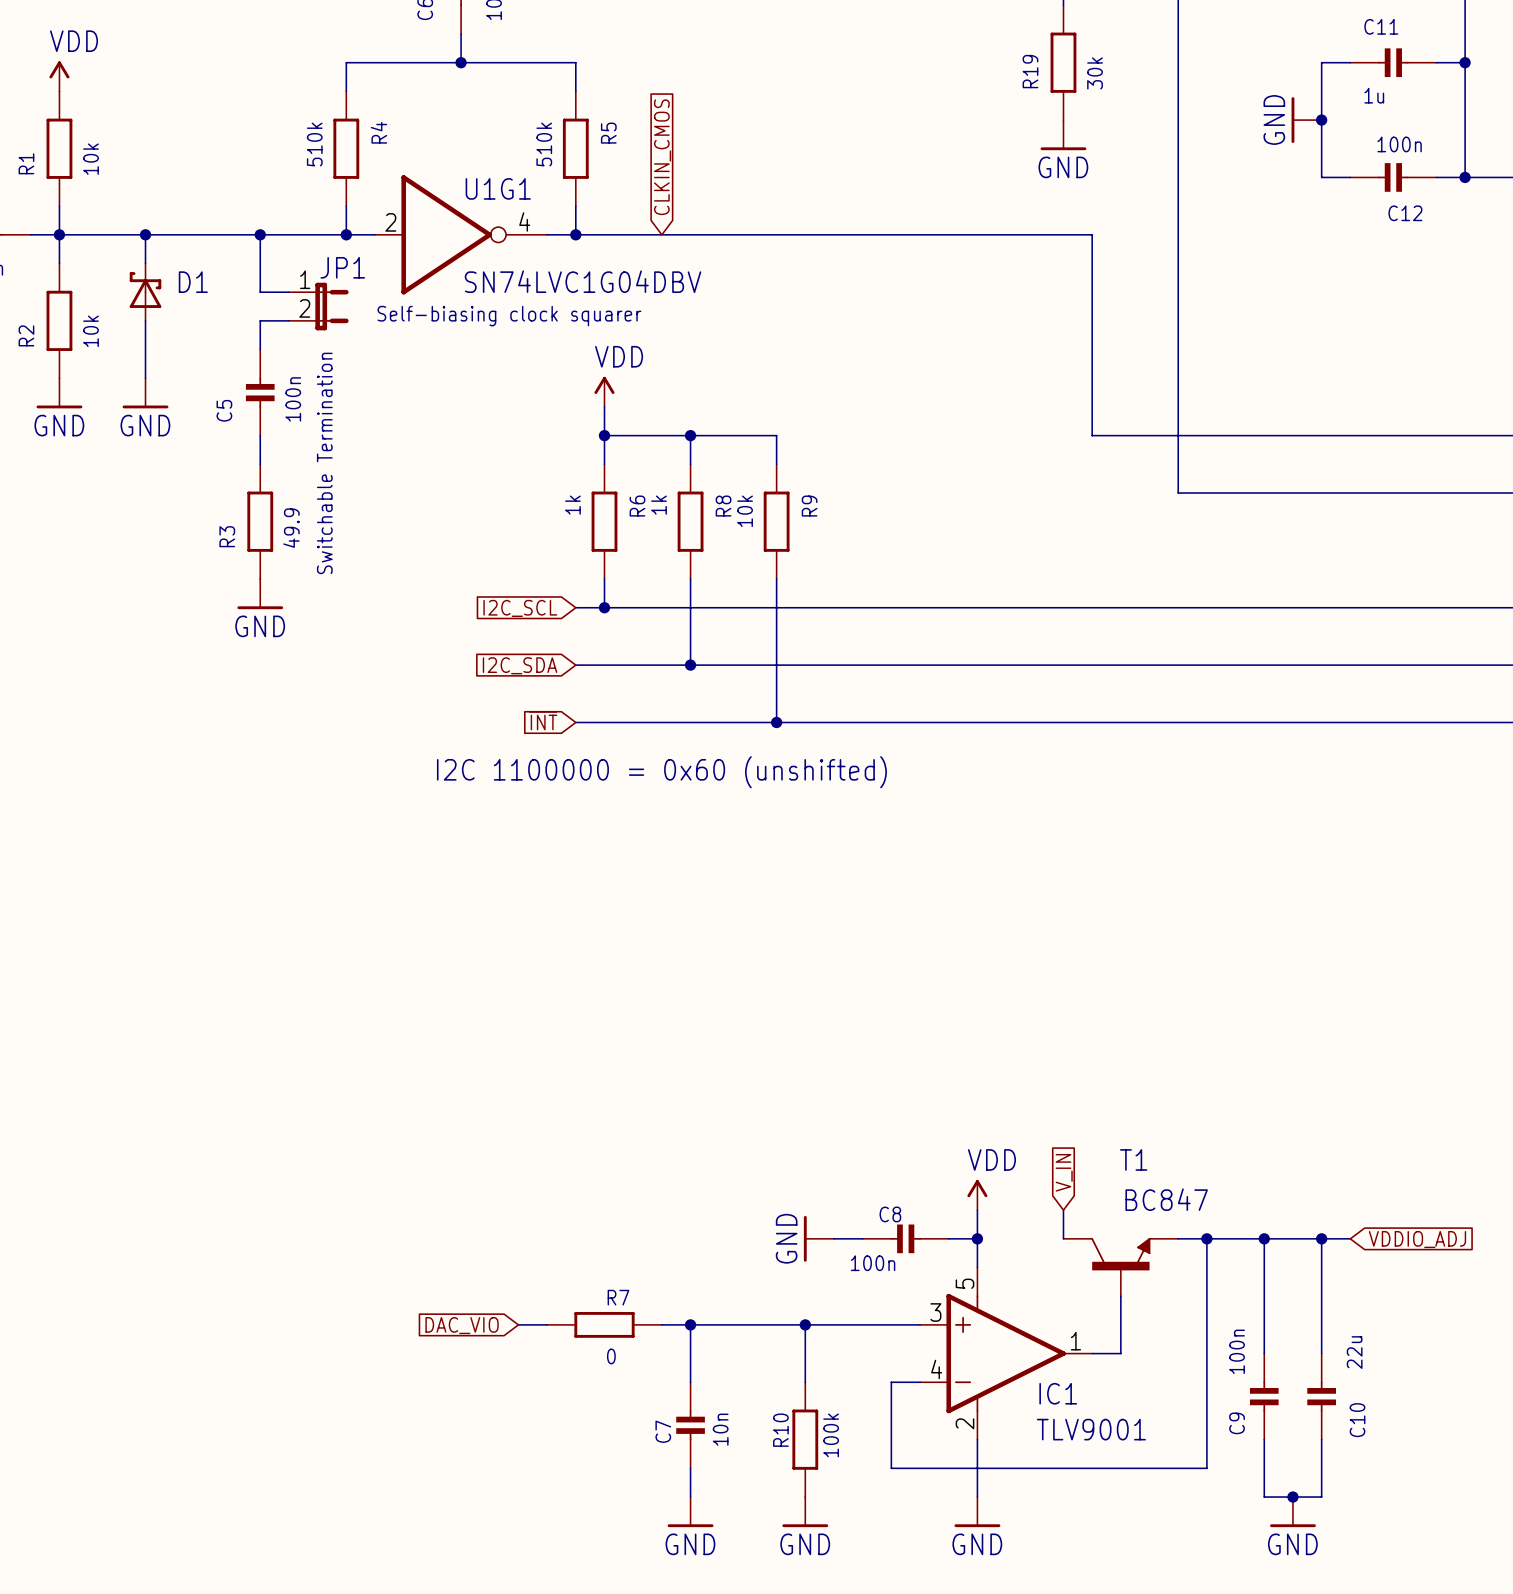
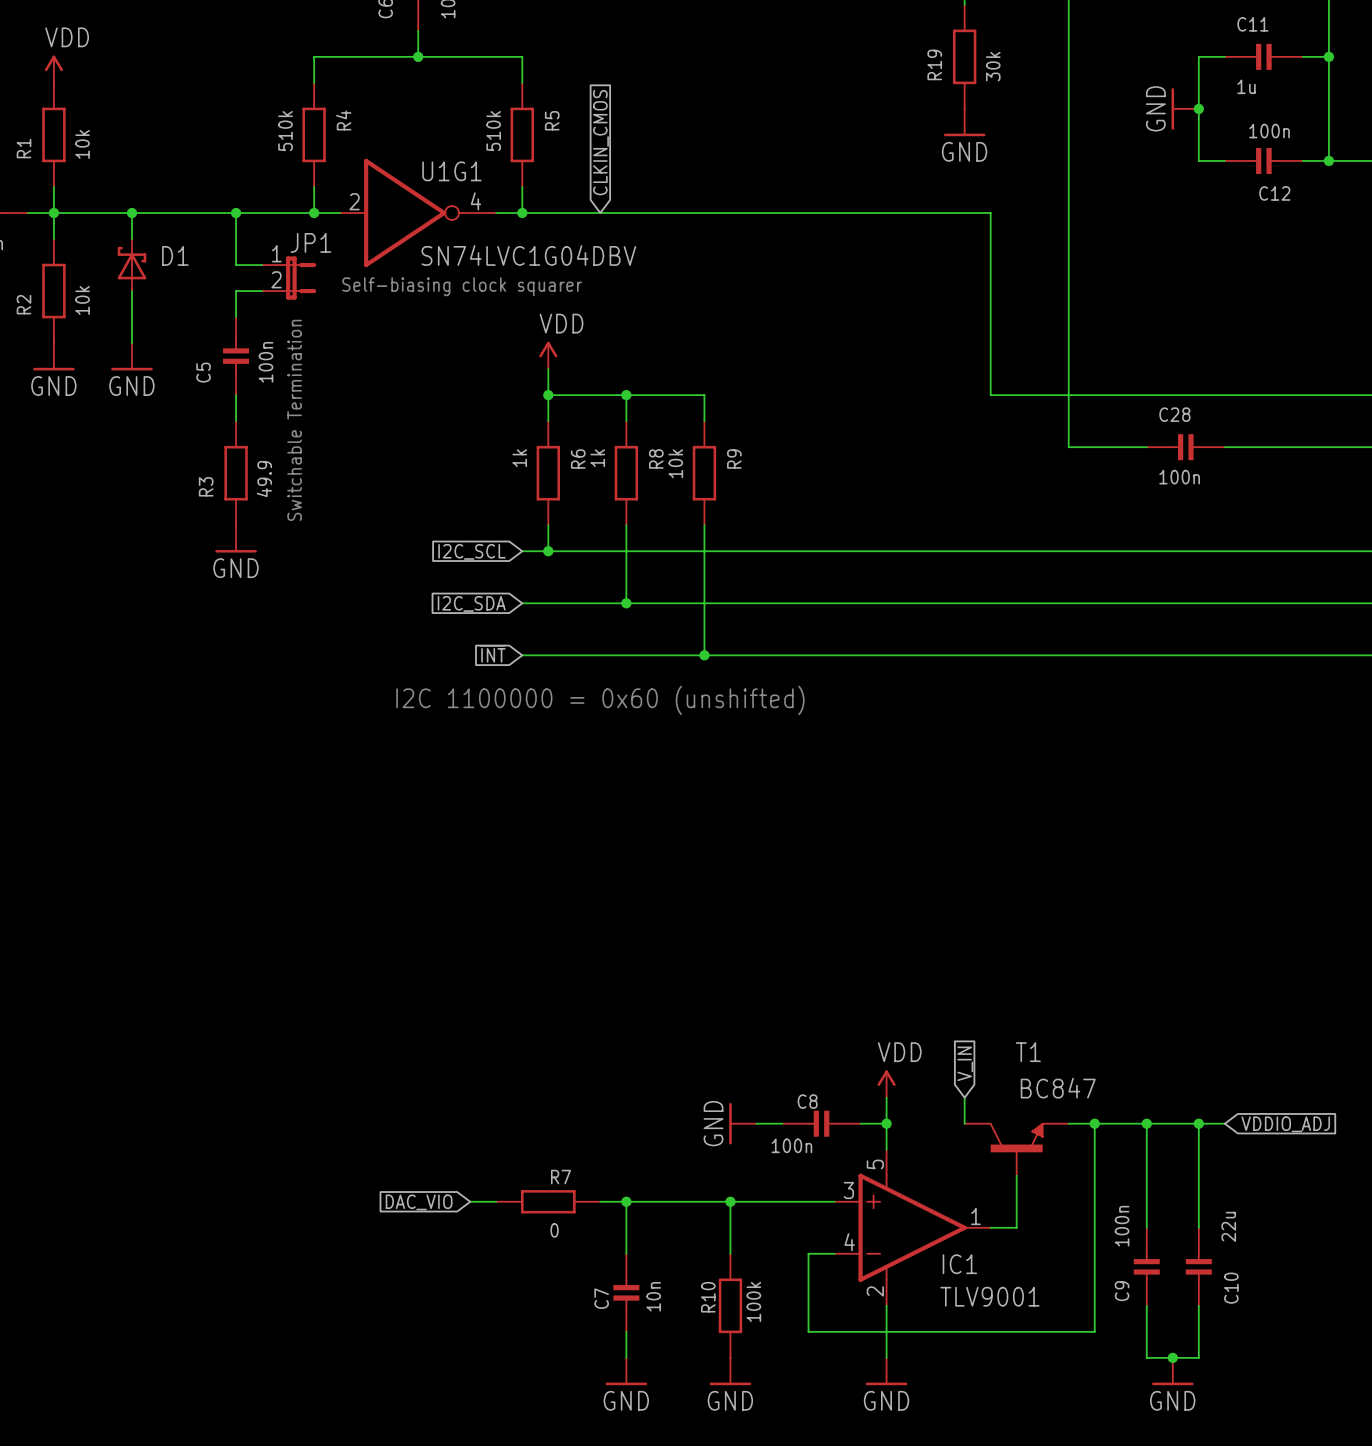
C28: none -> 100n (1185, 447)

